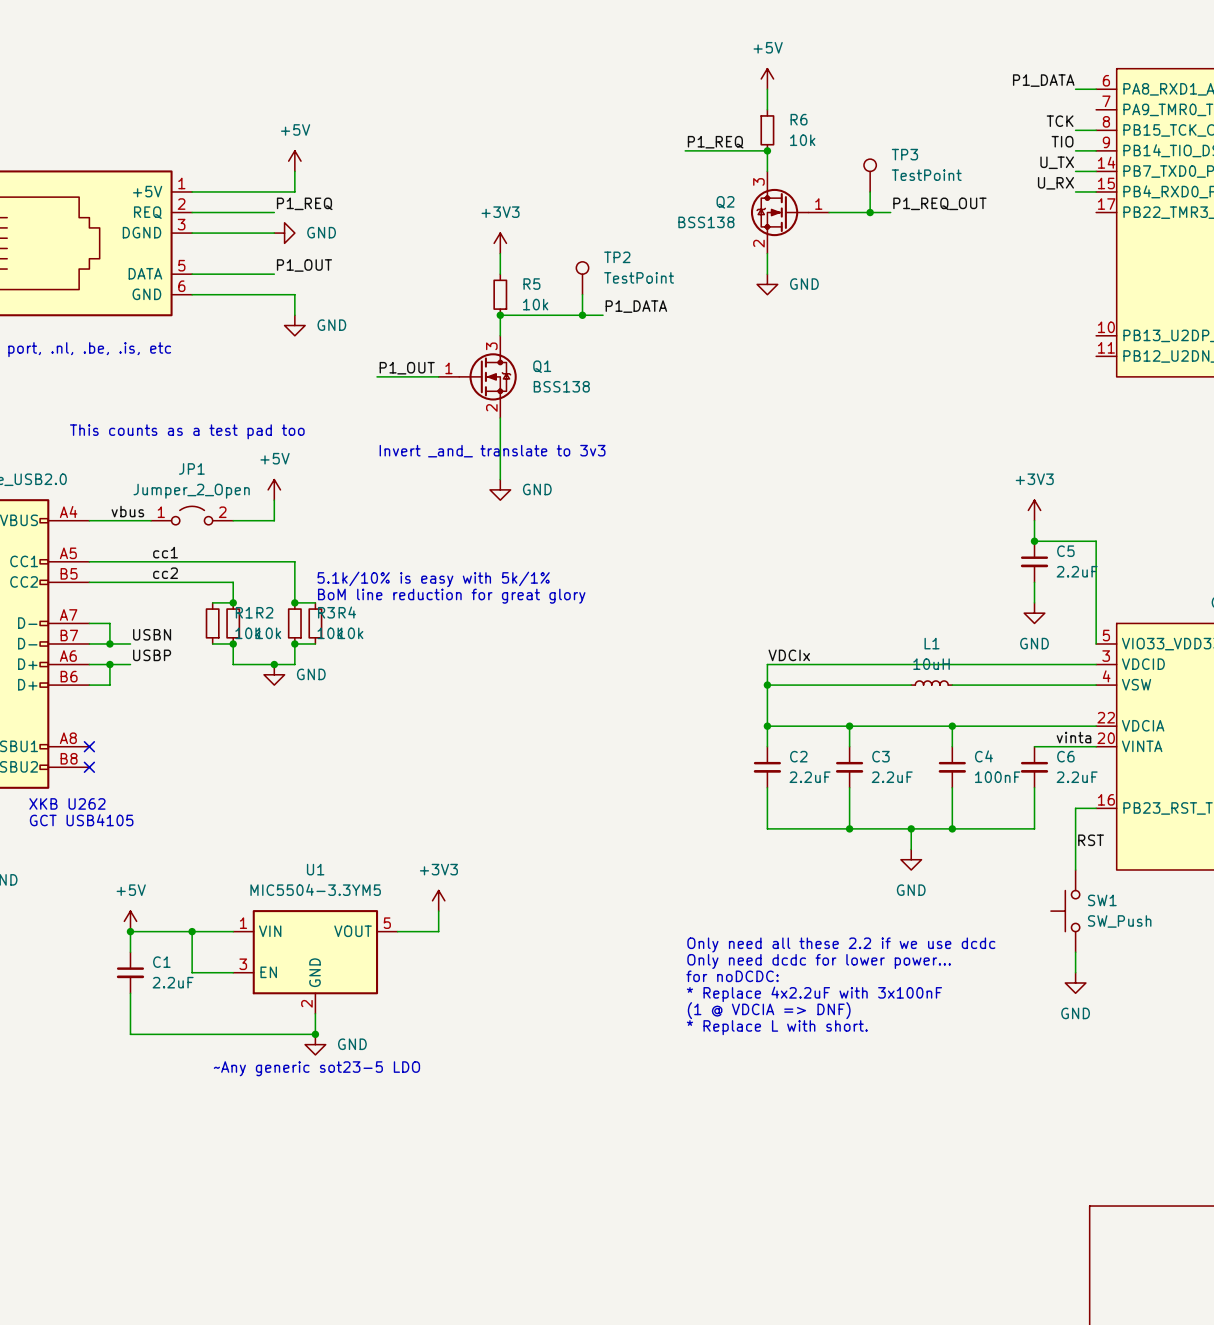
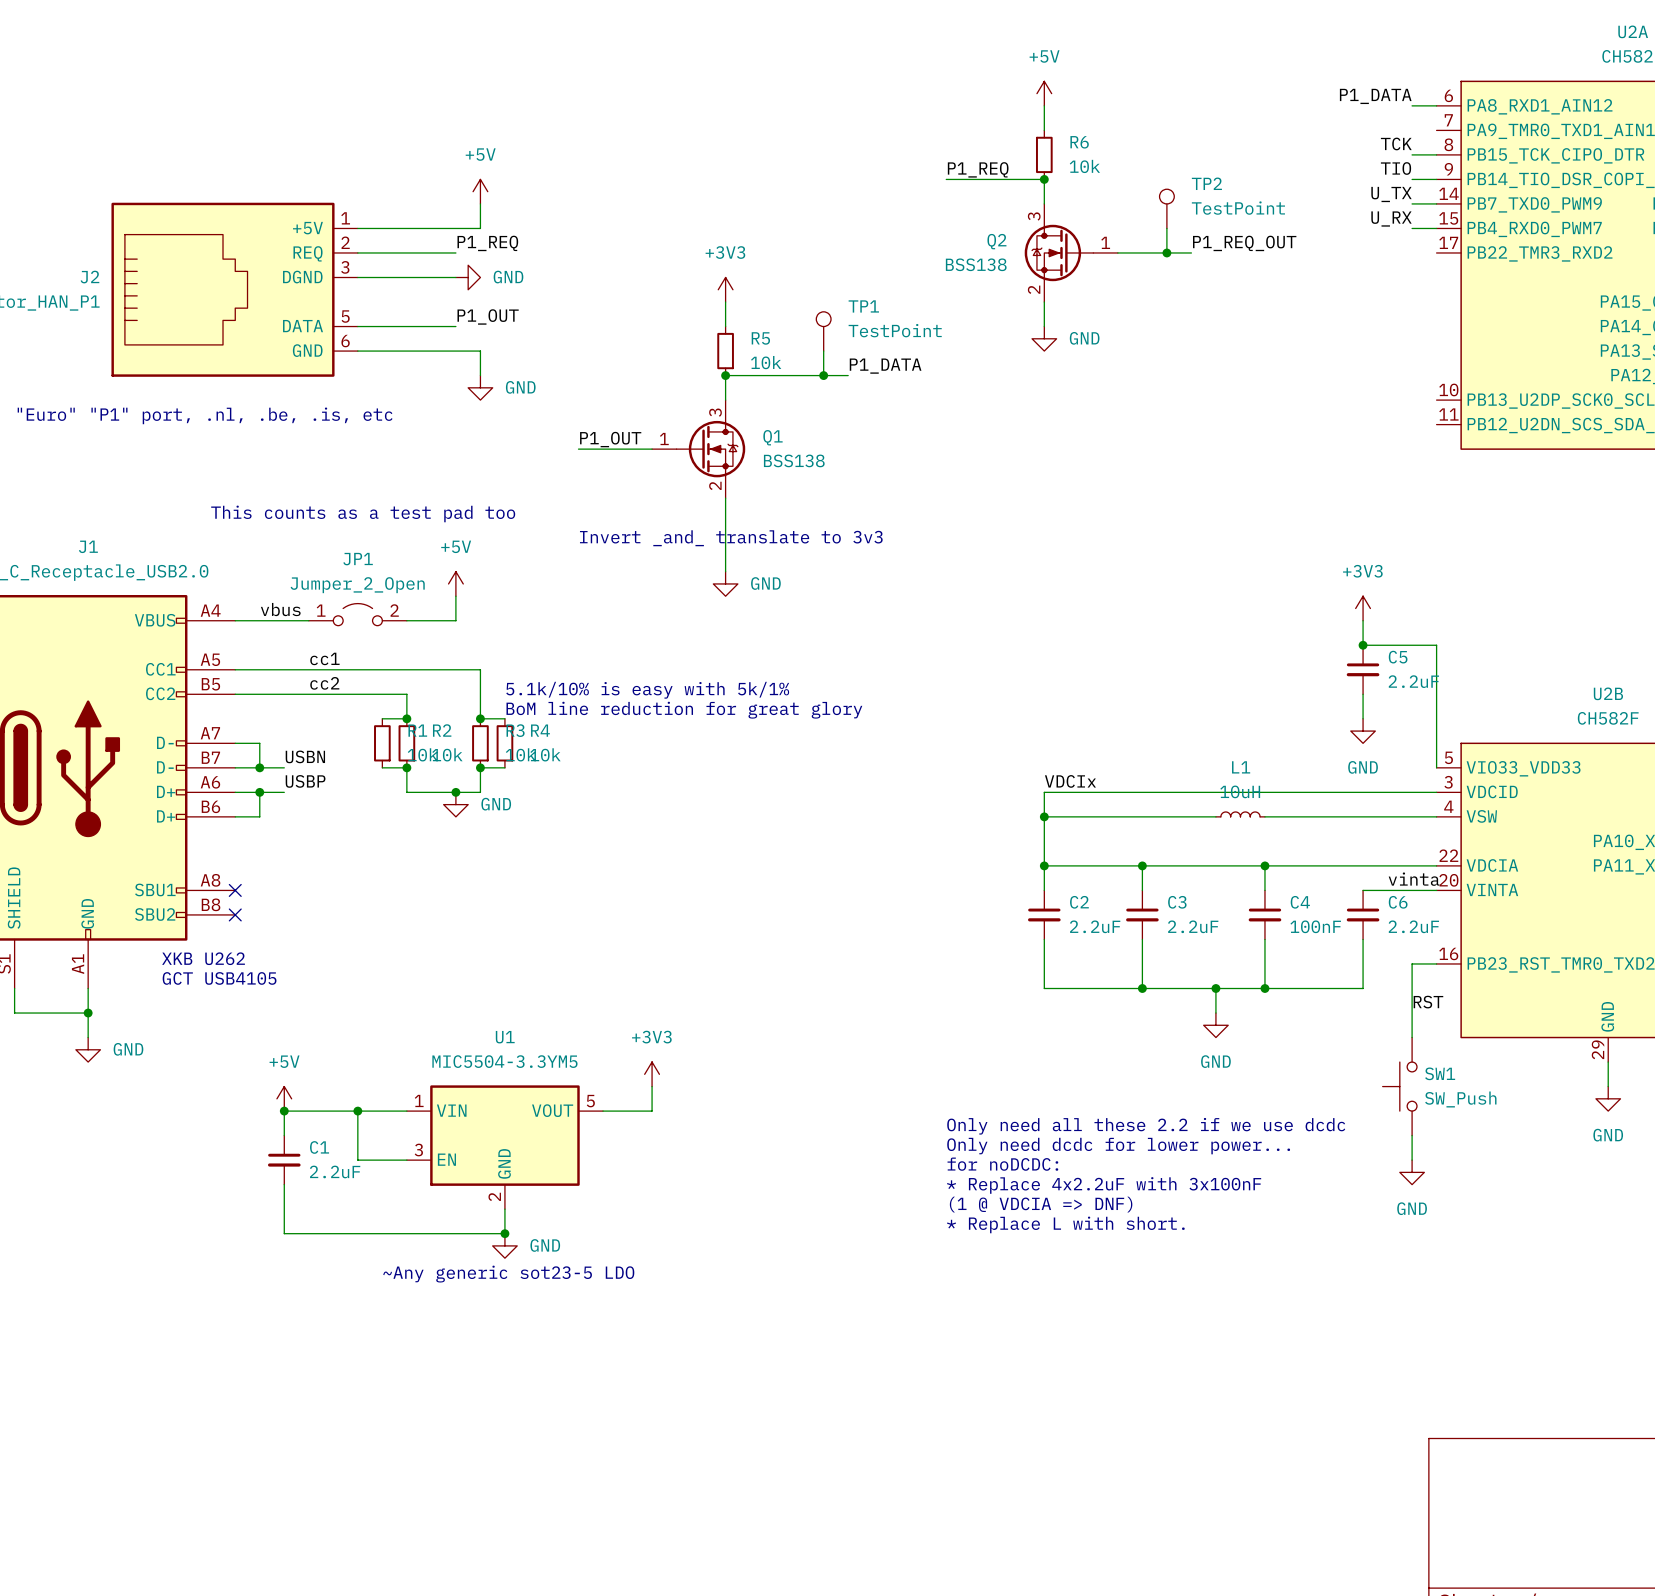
TP3 name: TP3 (904, 154) -> TP2 (1206, 183)
TP2 name: TP2 (617, 257) -> TP1 (863, 306)

